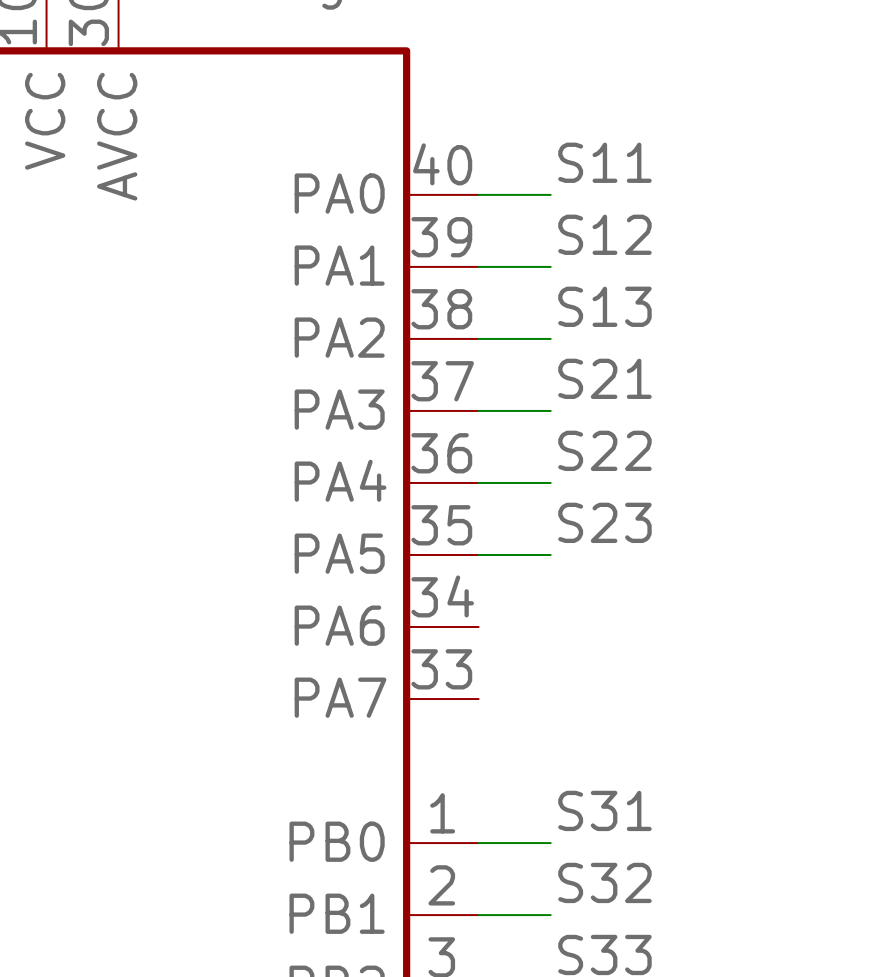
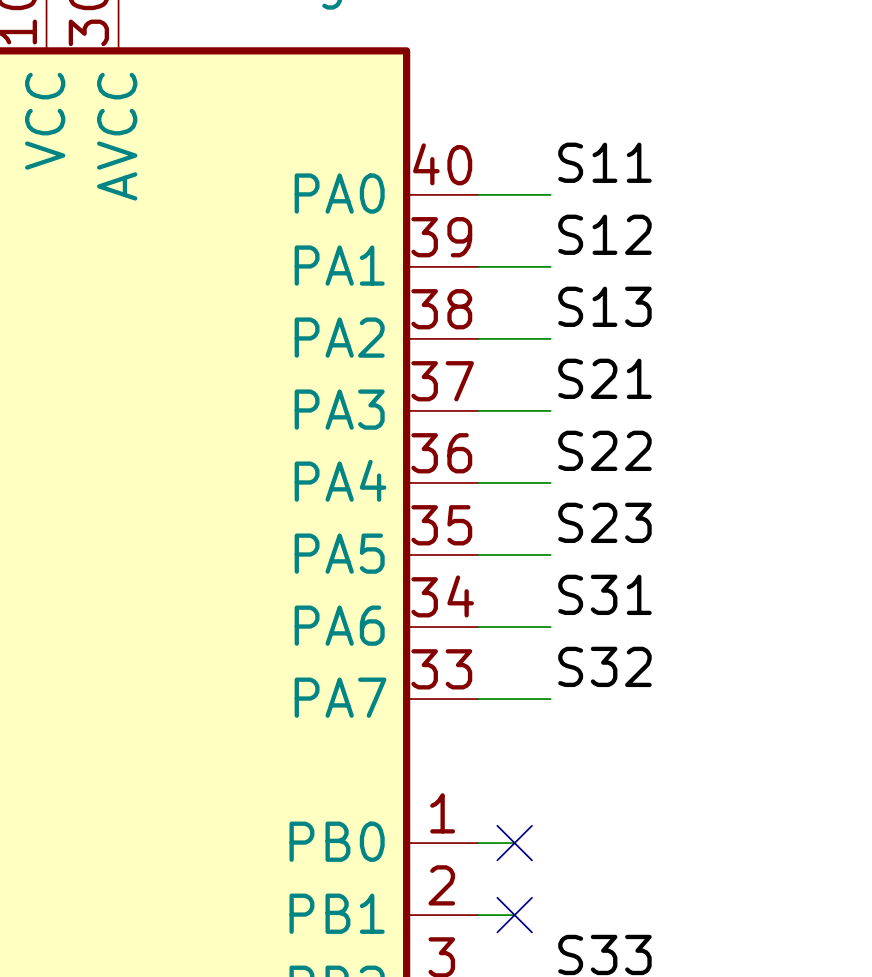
wire: none -> (478, 627) (550, 627)
wire: none -> (478, 699) (550, 699)
label position: S31 (604, 810) -> S31 (604, 594)
wire: (514, 843) (550, 843) -> none
no-connect mark: none -> (514, 843)
label position: S32 (604, 882) -> S32 (604, 666)
wire: (514, 915) (550, 915) -> none
no-connect mark: none -> (514, 915)

